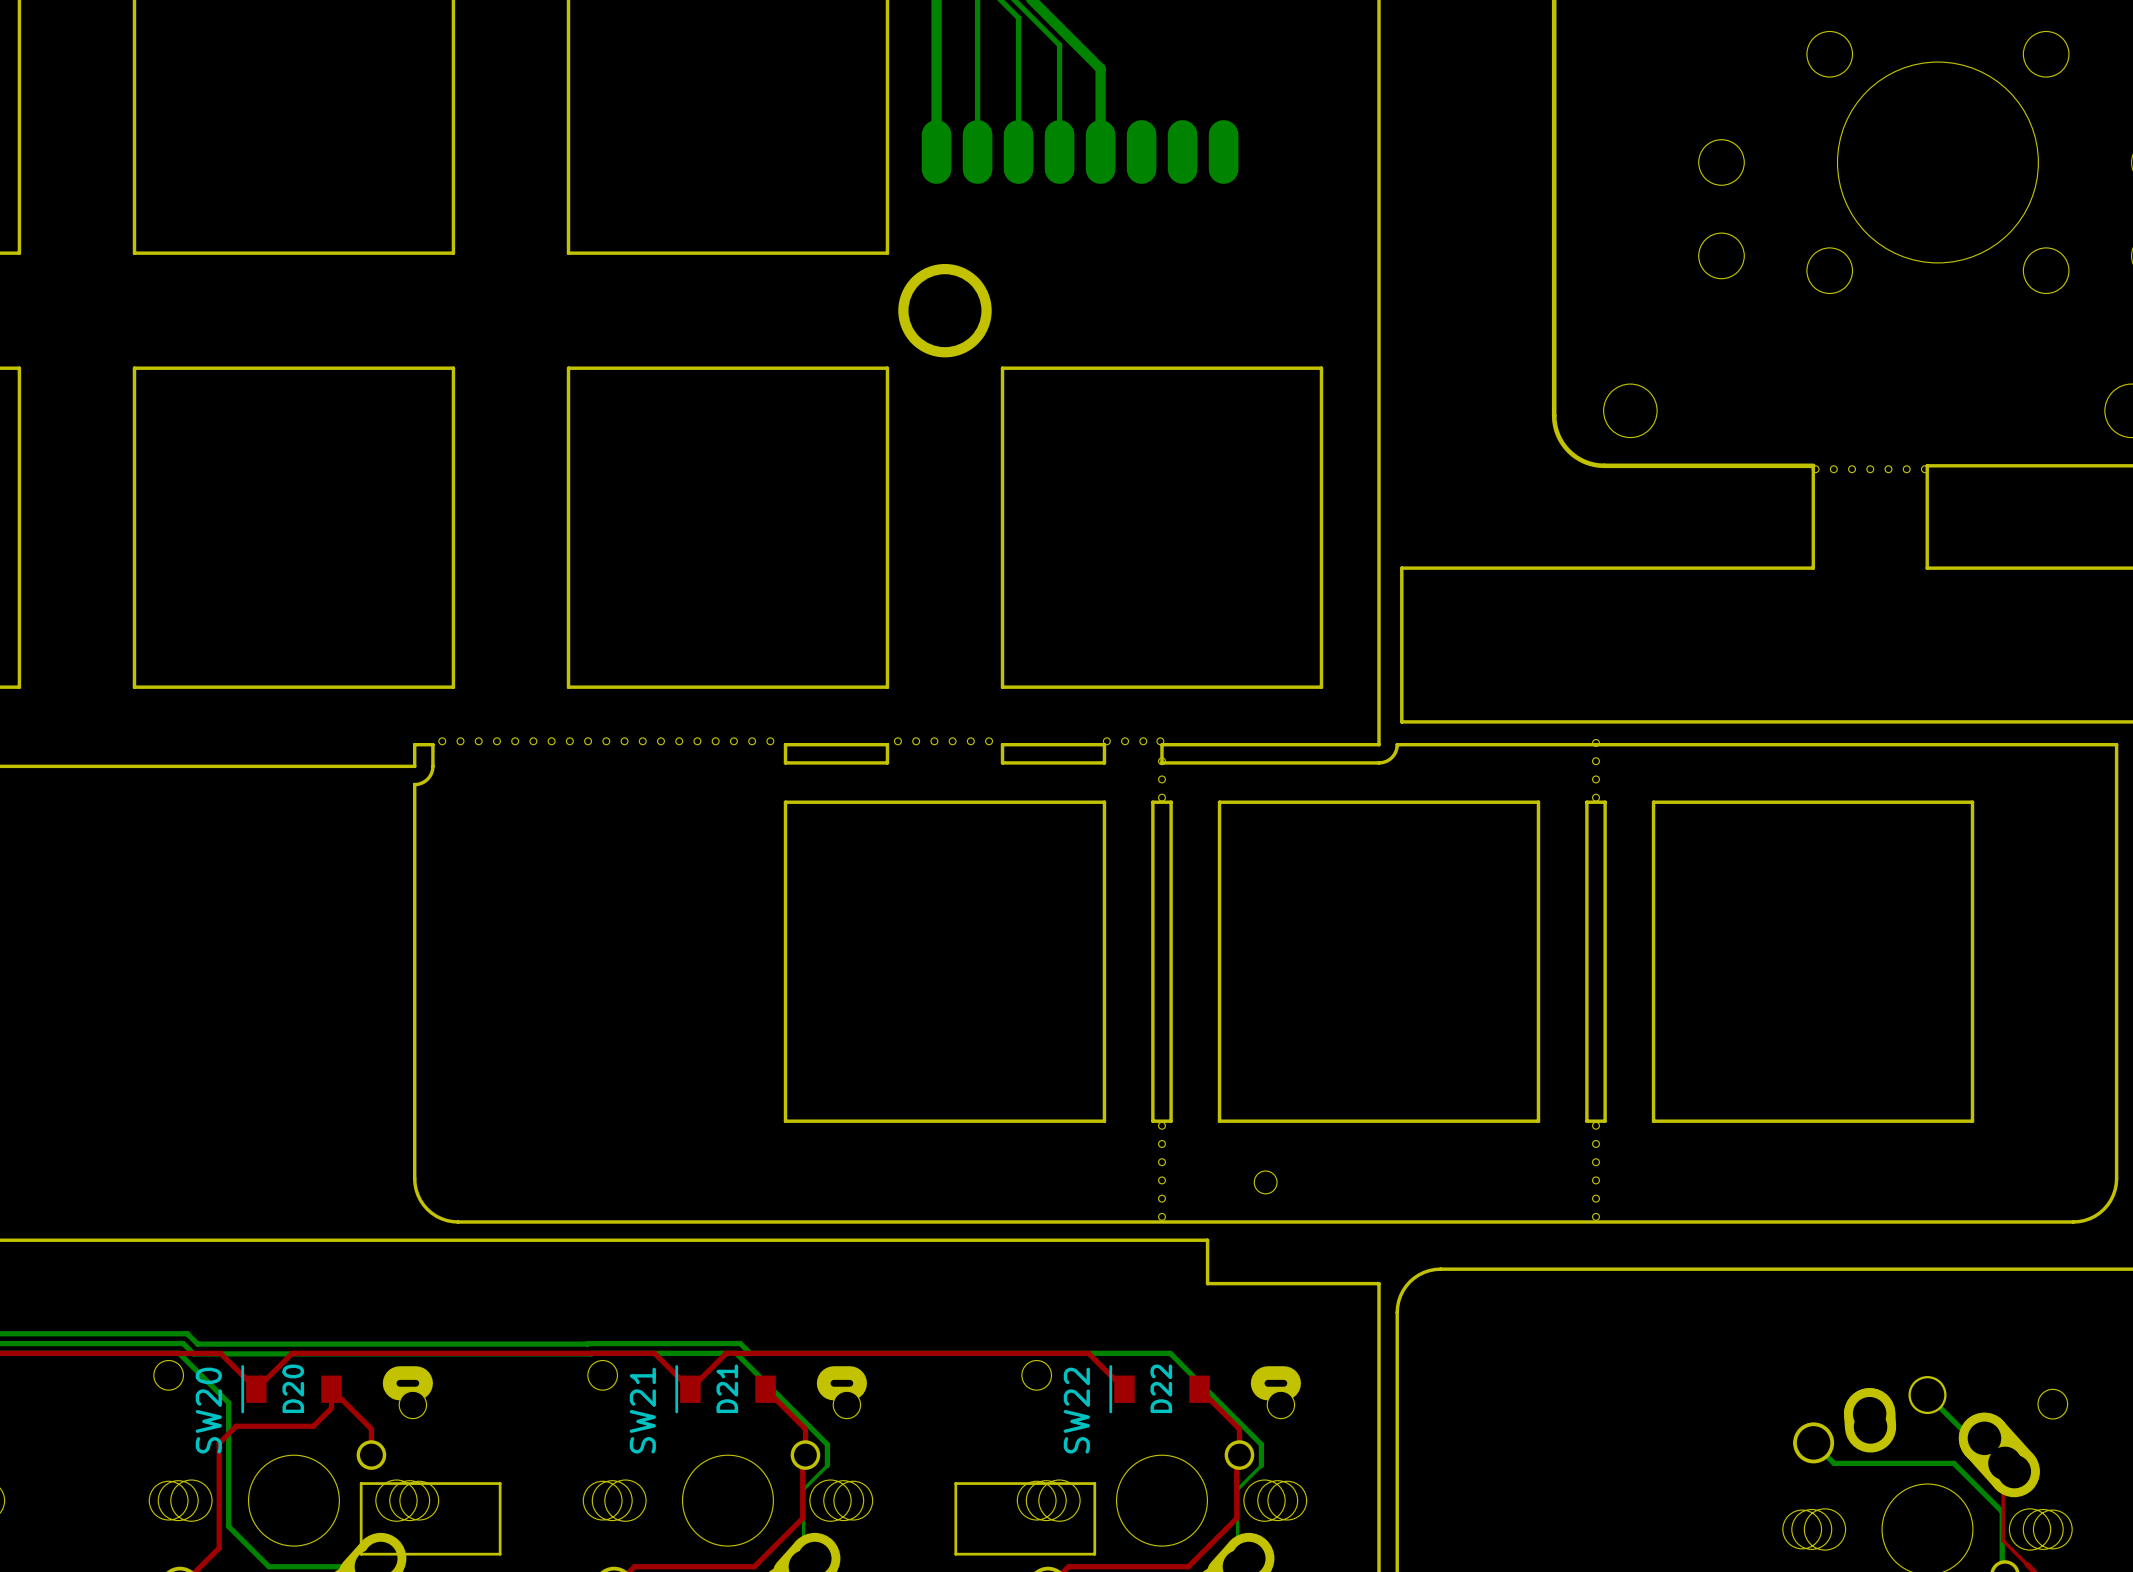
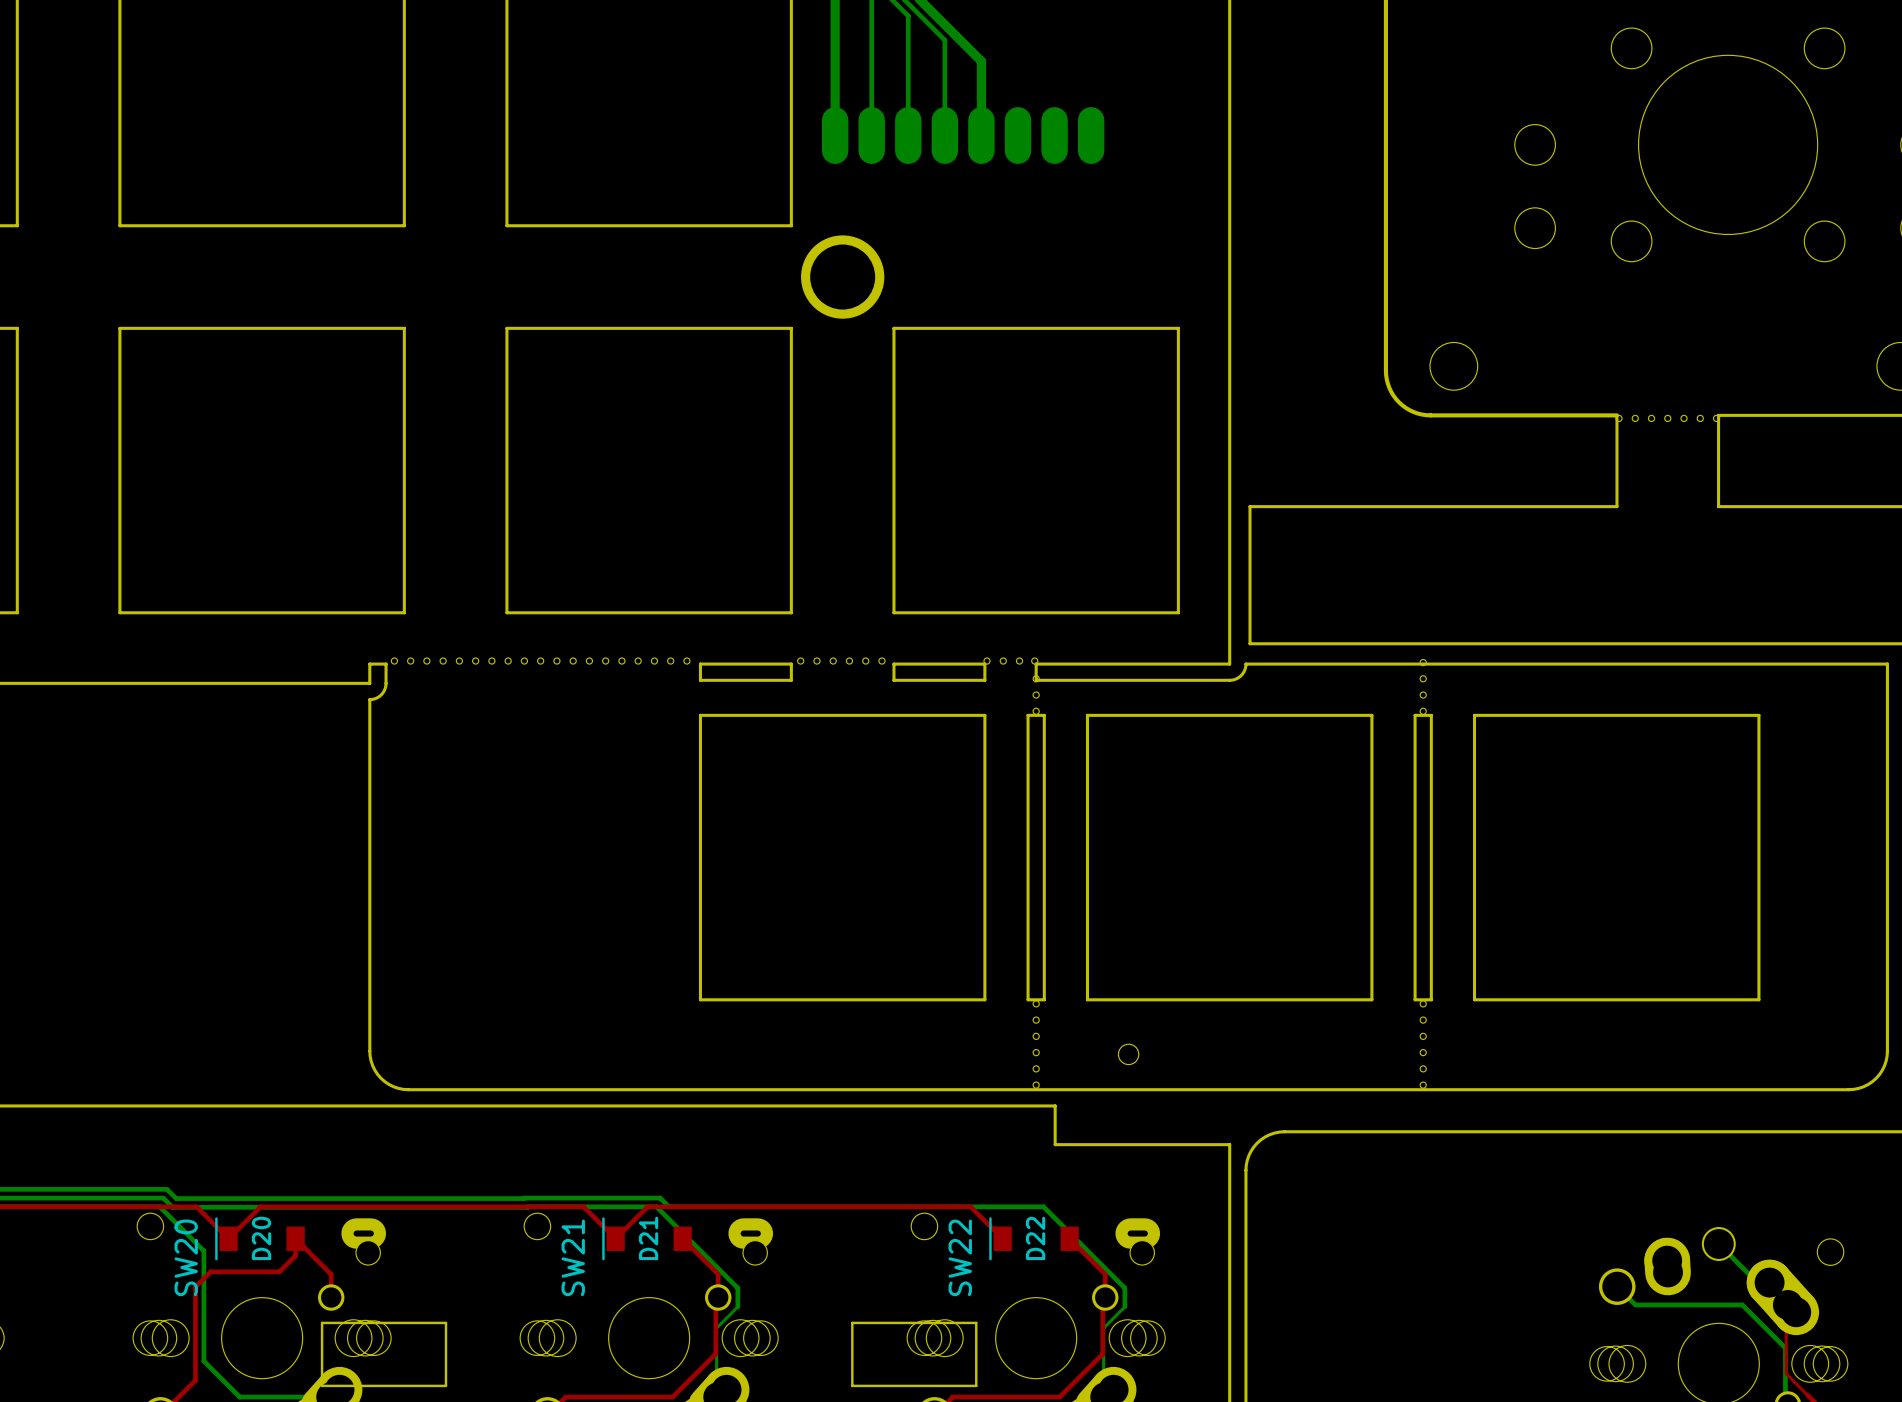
board edge: (1183, 1240) (1207, 1240) (1207, 1283) -> (1055, 1105) (1055, 1144) (1076, 1144)

